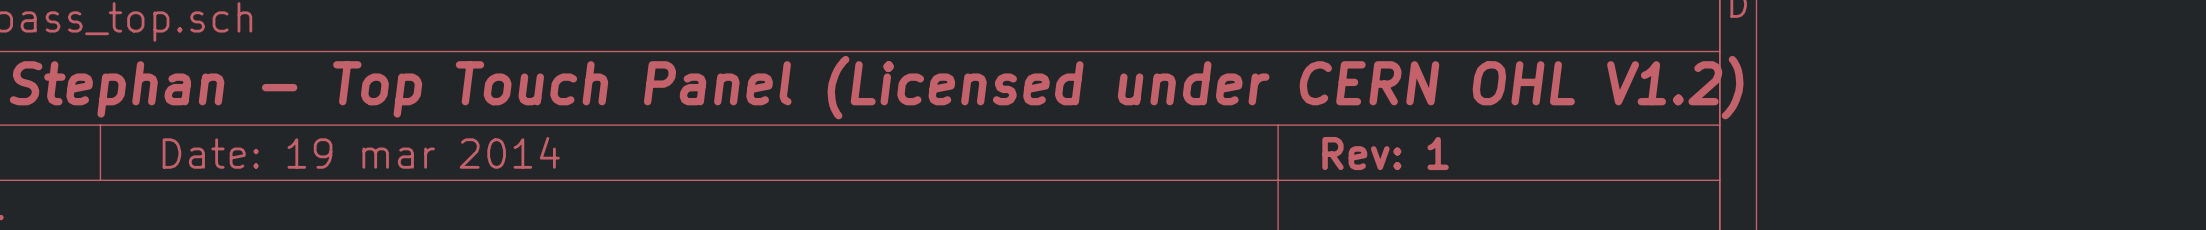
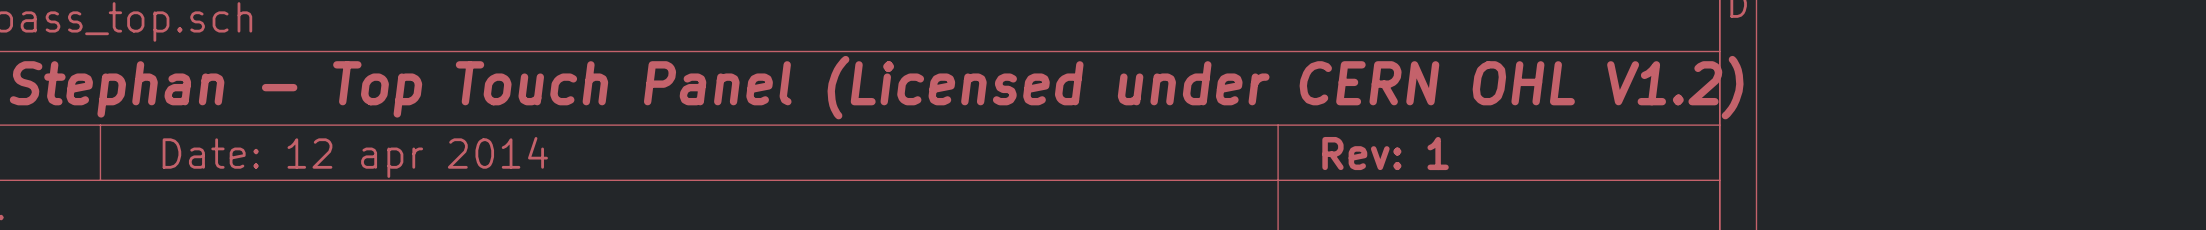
title block: Date: 19 mar 2014 (361, 152) -> Date: 12 apr 2014 (355, 157)

